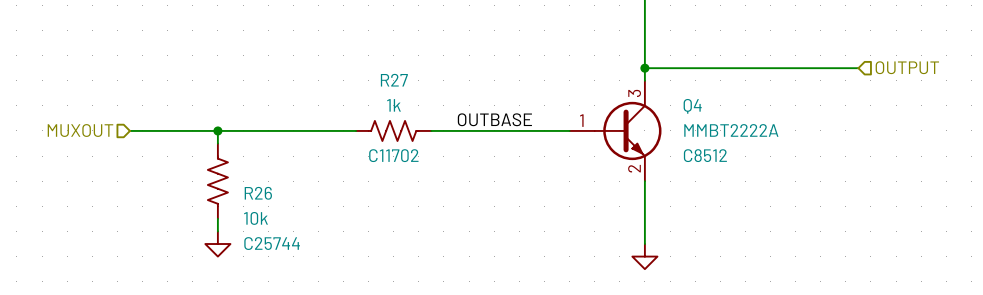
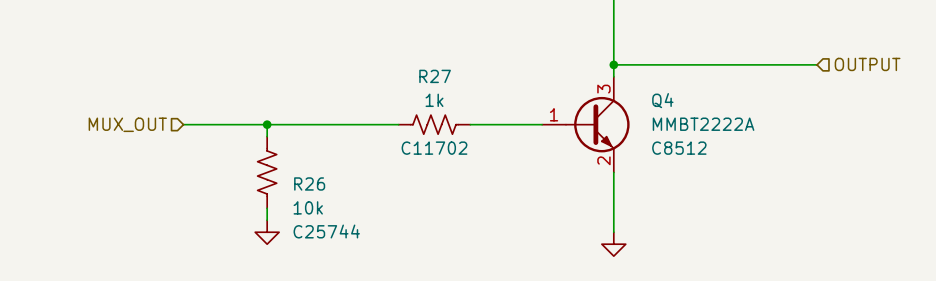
label: OUTBASE (494, 119) -> none
hierarchical label: MUXOUT (80, 130) -> MUX_OUT (127, 124)
wire: (129, 130) (192, 130) -> none
wire: (217, 130) (217, 143) -> (267, 124) (267, 136)
junction: (217, 130) -> none
junction: none -> (267, 124)
R27 position: (393, 130) -> (434, 124)
wire: (431, 130) (494, 130) -> (338, 124) (398, 124)
R26 position: (217, 181) -> (267, 172)
wire: (217, 218) (217, 231) -> (267, 208) (267, 220)
power symbol position: (217, 244) -> (267, 232)

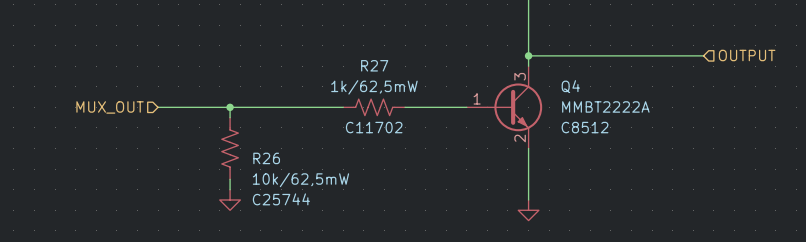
R27 value: 1k (434, 100) -> 1k/62,5mW (374, 87)
R26 value: 10k (308, 207) -> 10k/62,5mW (300, 180)

